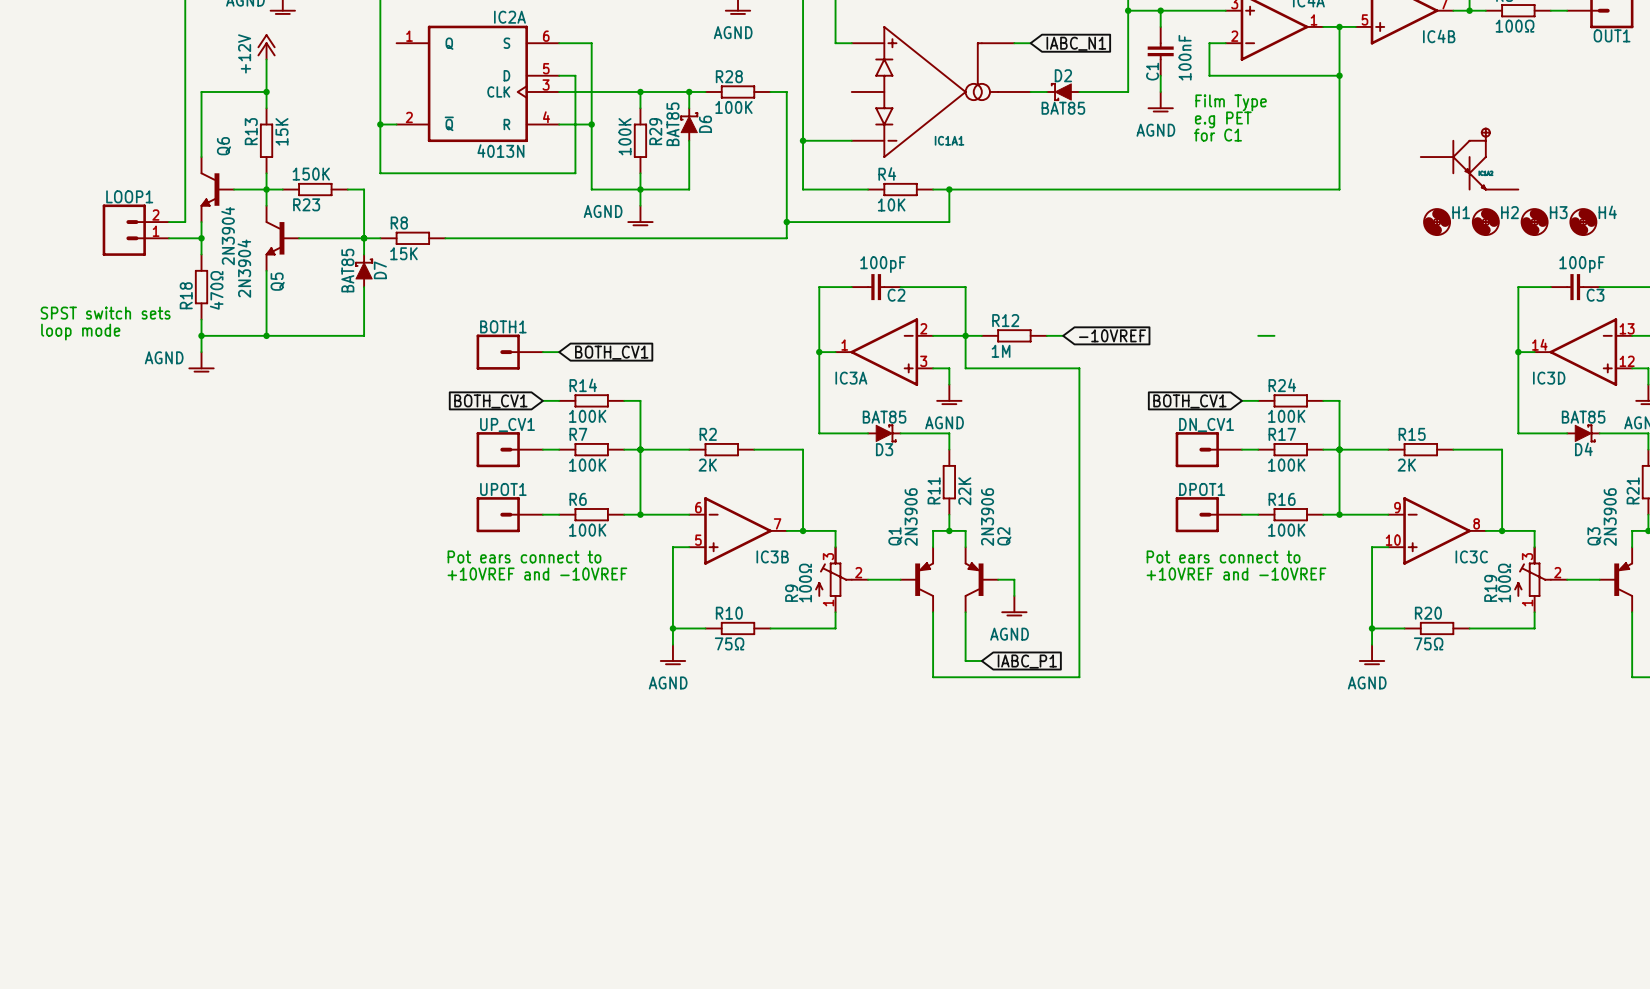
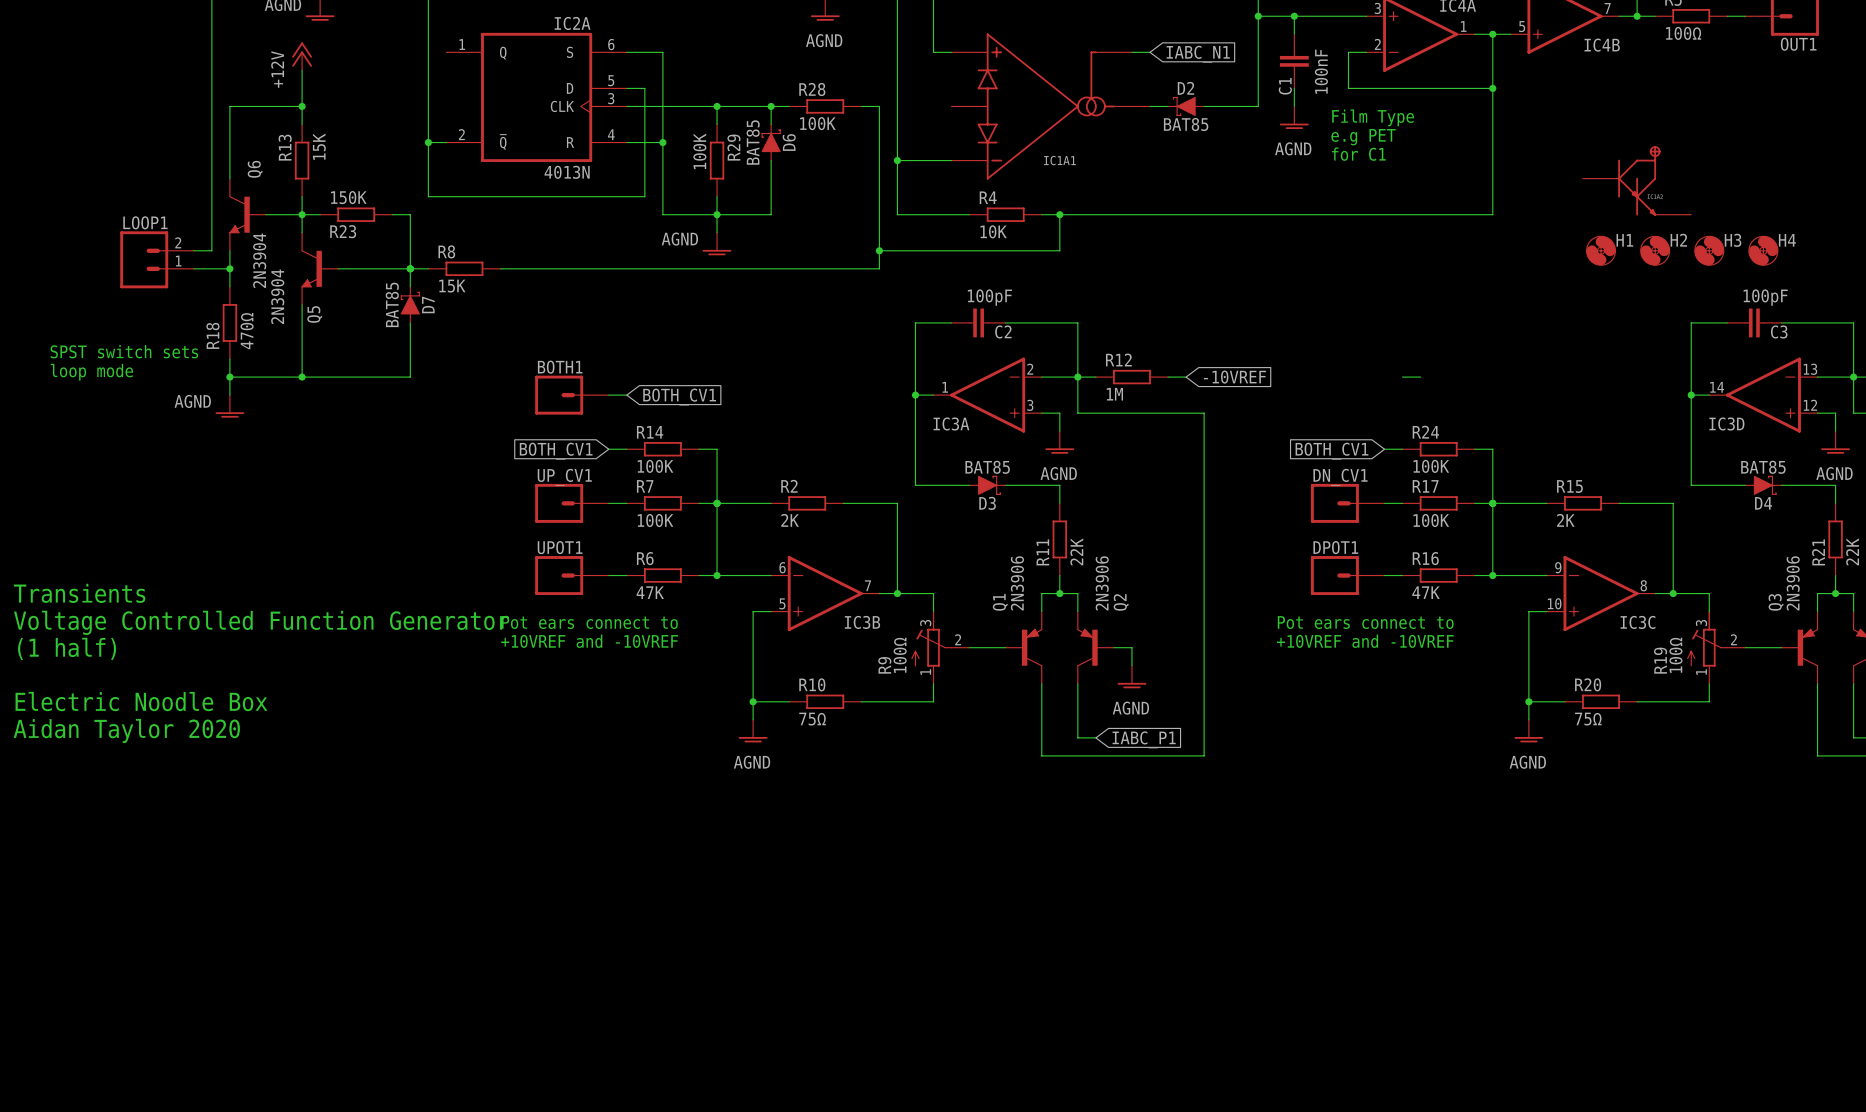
text: none -> Transients (79, 593)
R6 value: 100K (587, 530) -> 47K (650, 592)
R16 value: 100K (1286, 530) -> 47K (1426, 592)
text: none -> Voltage Controlled Function Generator (261, 622)
text: none -> (1 half) (67, 648)
text: none -> Electric Noodle Box (141, 701)
text: none -> Aidan Taylor 2020 (126, 731)

